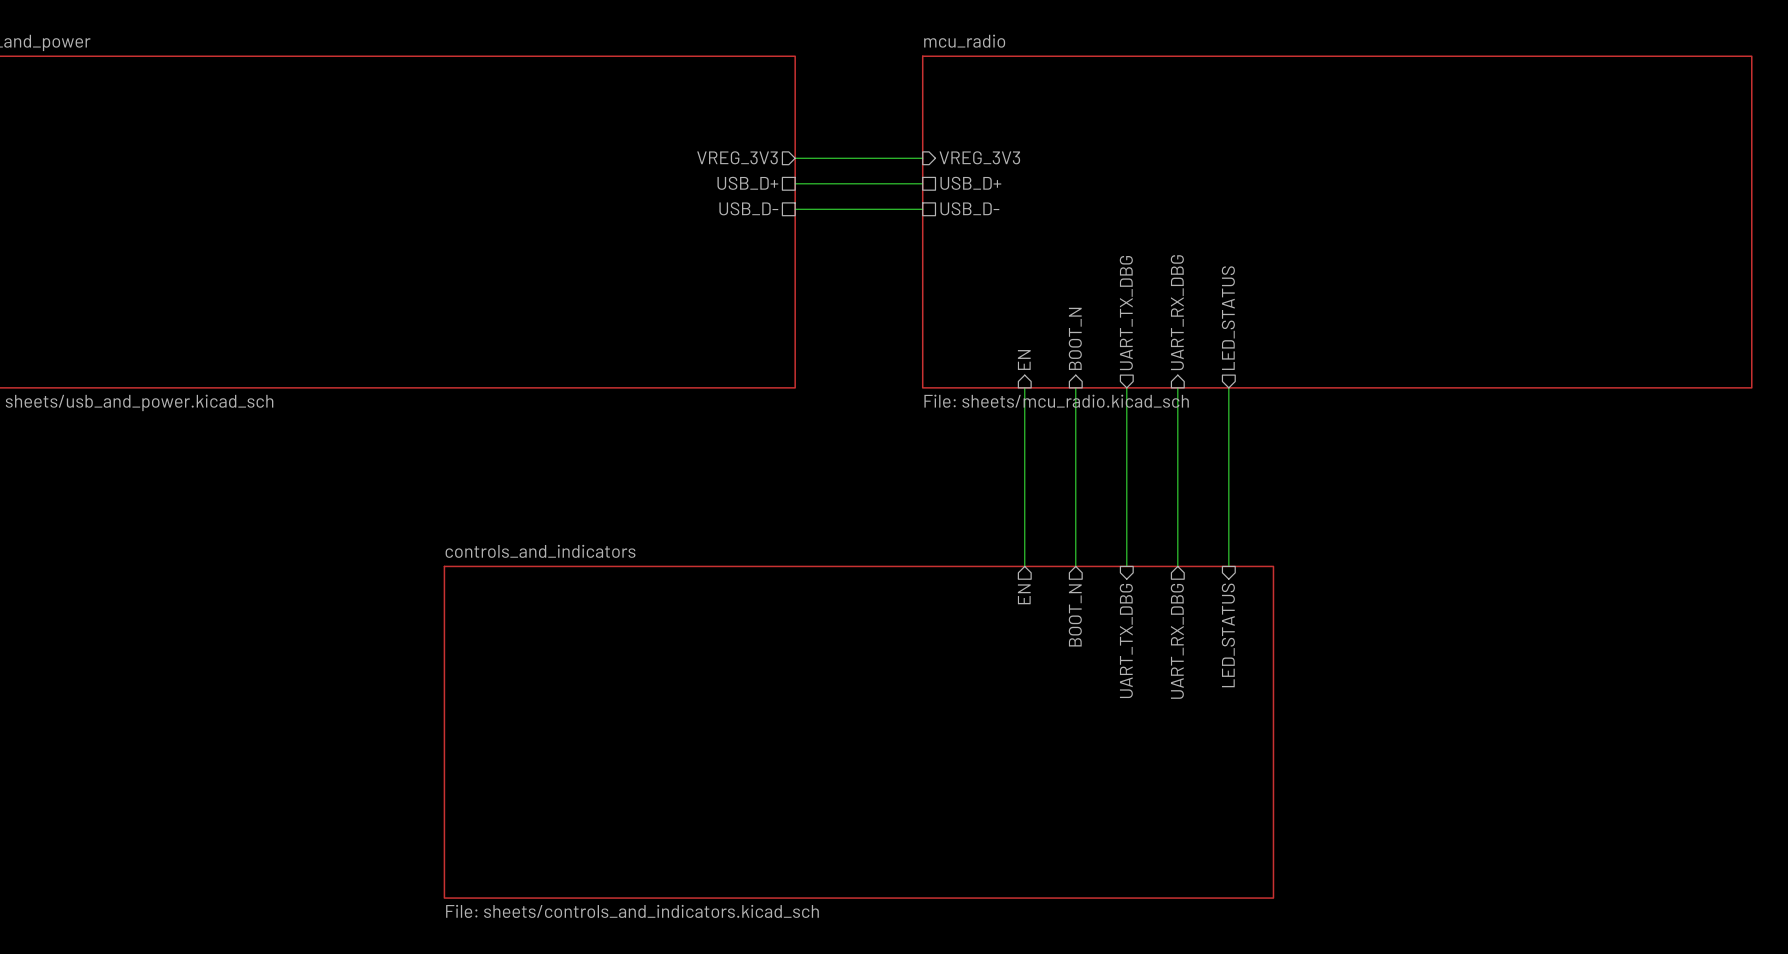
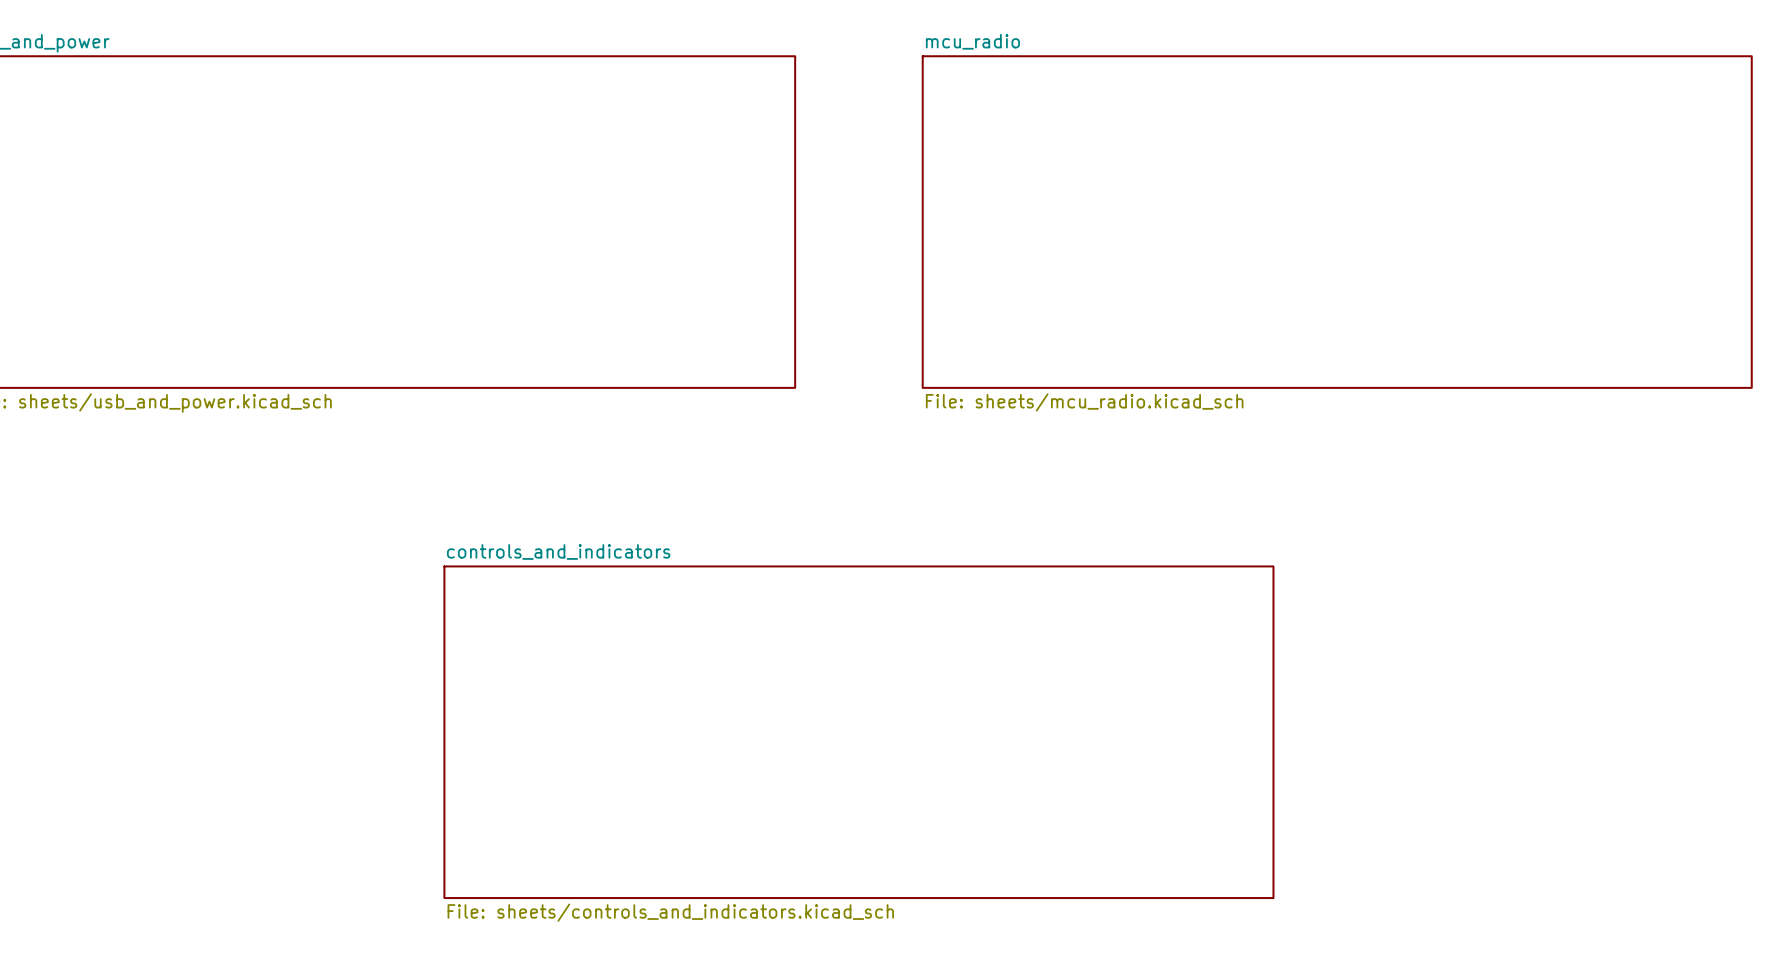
sheet pin: VREG_3V3 (737, 157) -> none
sheet pin: VREG_3V3 (979, 157) -> none
wire: (795, 158) (922, 158) -> none
sheet pin: USB_D+ (747, 183) -> none
wire: (795, 183) (922, 183) -> none
sheet pin: USB_D+ (970, 183) -> none
sheet pin: USB_D- (748, 208) -> none
sheet pin: USB_D- (969, 208) -> none
wire: (795, 209) (922, 209) -> none
sheet pin: UART_RX_DBG (1177, 312) -> none
sheet pin: UART_TX_DBG (1126, 313) -> none
sheet pin: LED_STATUS (1228, 318) -> none
sheet pin: BOOT_N (1075, 338) -> none
sheet pin: EN (1024, 360) -> none
wire: (1024, 387) (1024, 566) -> none
wire: (1075, 387) (1075, 566) -> none
wire: (1126, 387) (1126, 566) -> none
wire: (1177, 387) (1177, 566) -> none
wire: (1228, 387) (1228, 566) -> none
sheet pin: EN (1024, 594) -> none
sheet pin: BOOT_N (1075, 615) -> none
sheet pin: LED_STATUS (1228, 635) -> none
sheet pin: UART_TX_DBG (1126, 640) -> none
sheet pin: UART_RX_DBG (1177, 641) -> none

